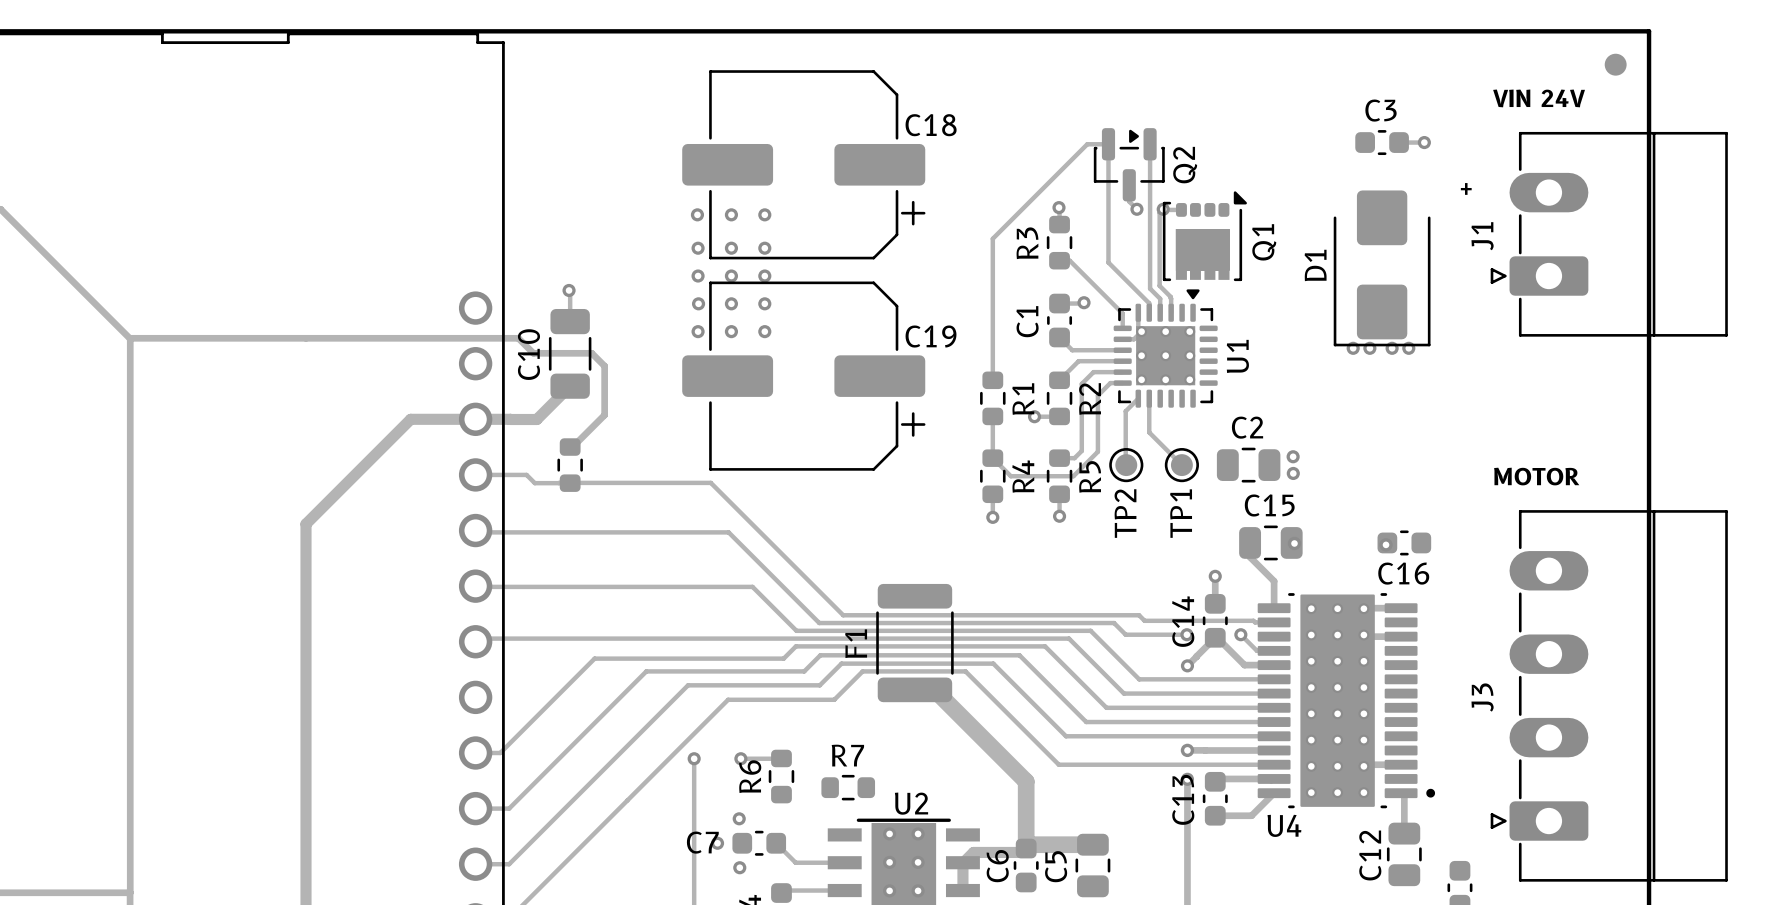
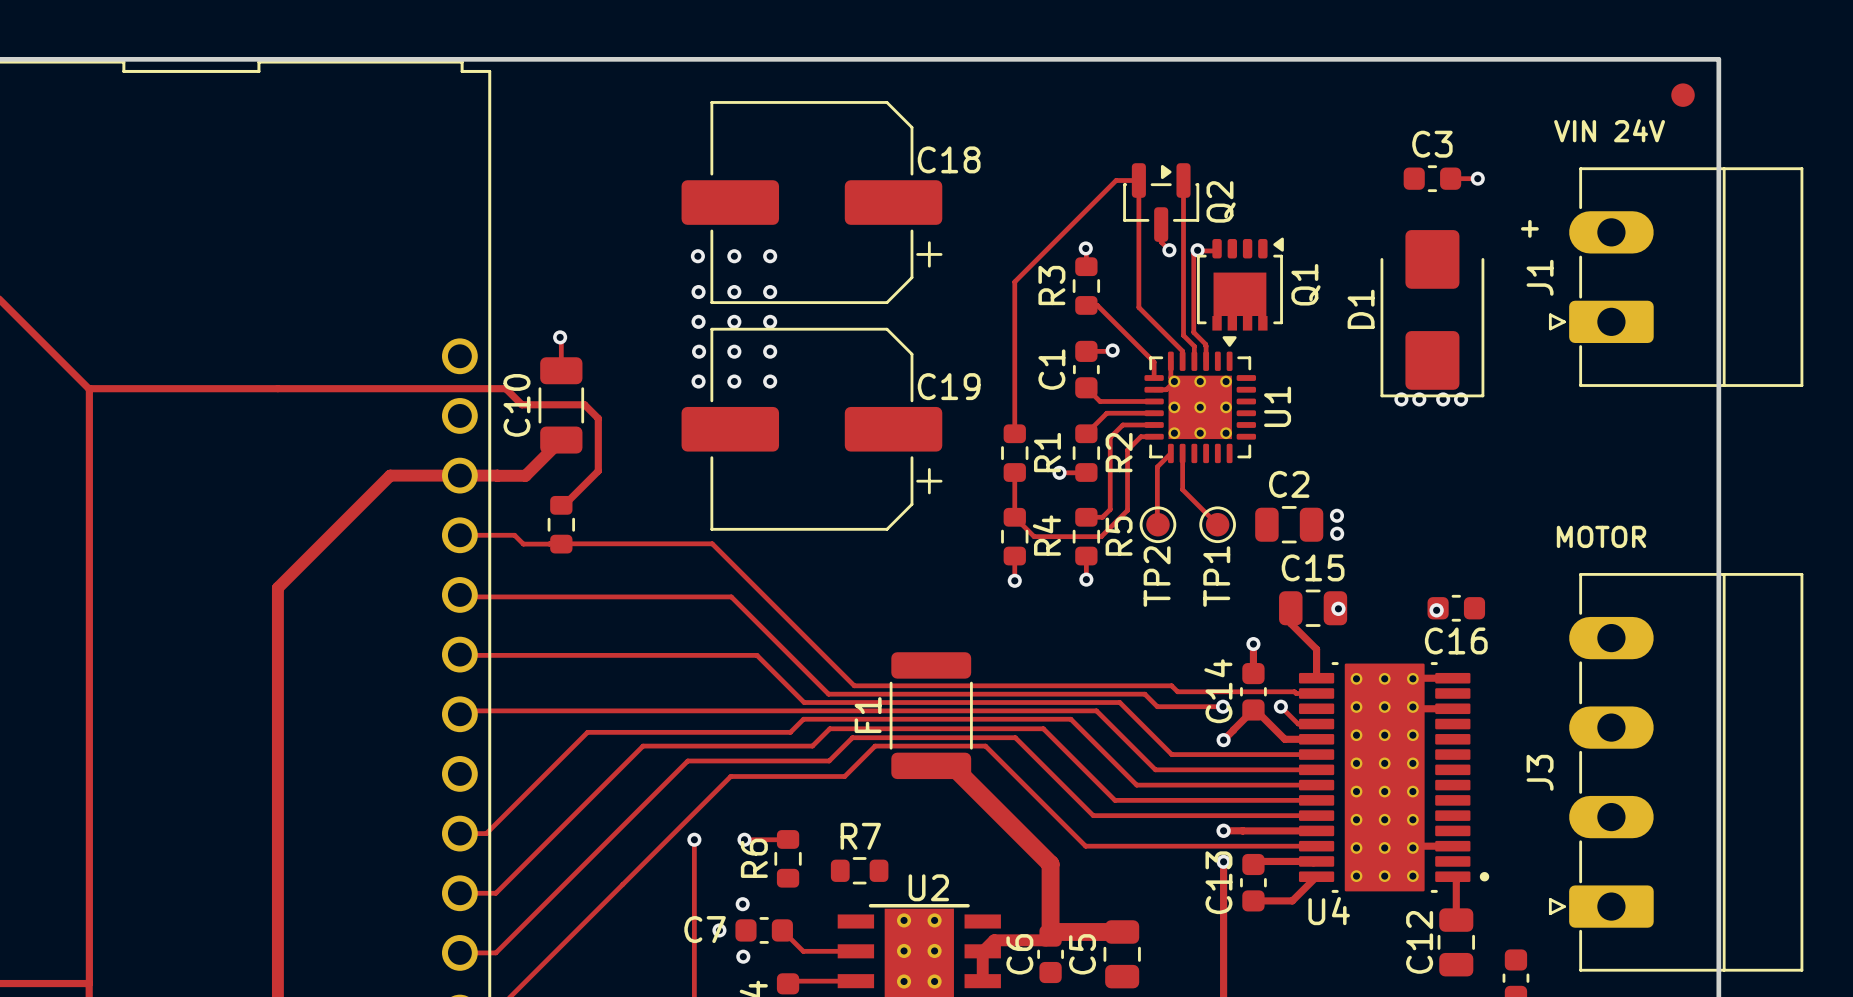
Q1 footprint: [1162, 191, 1247, 282] -> [1196, 237, 1284, 331]

